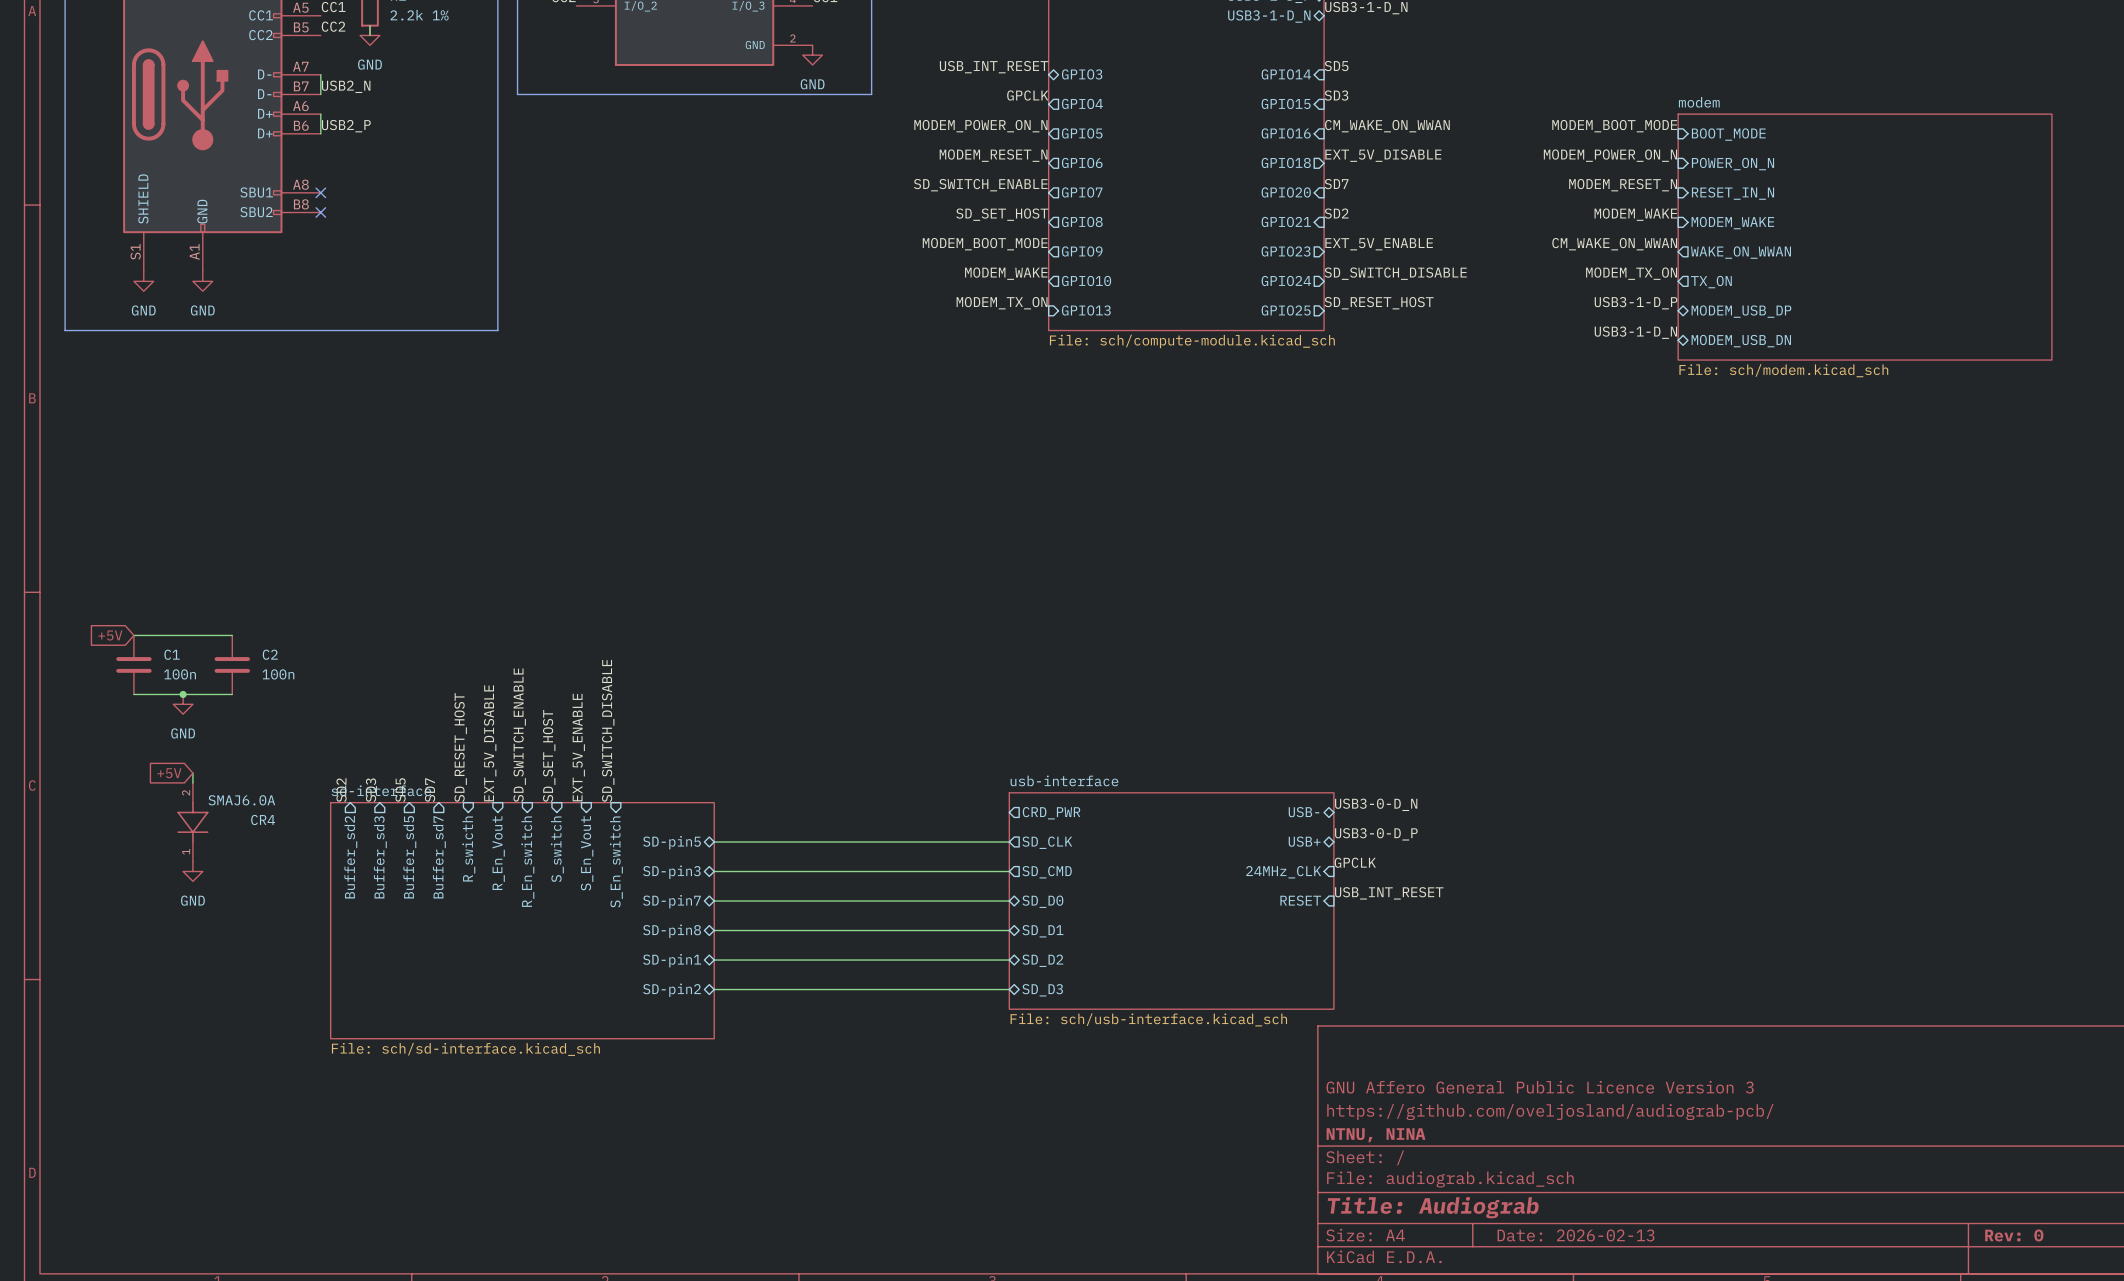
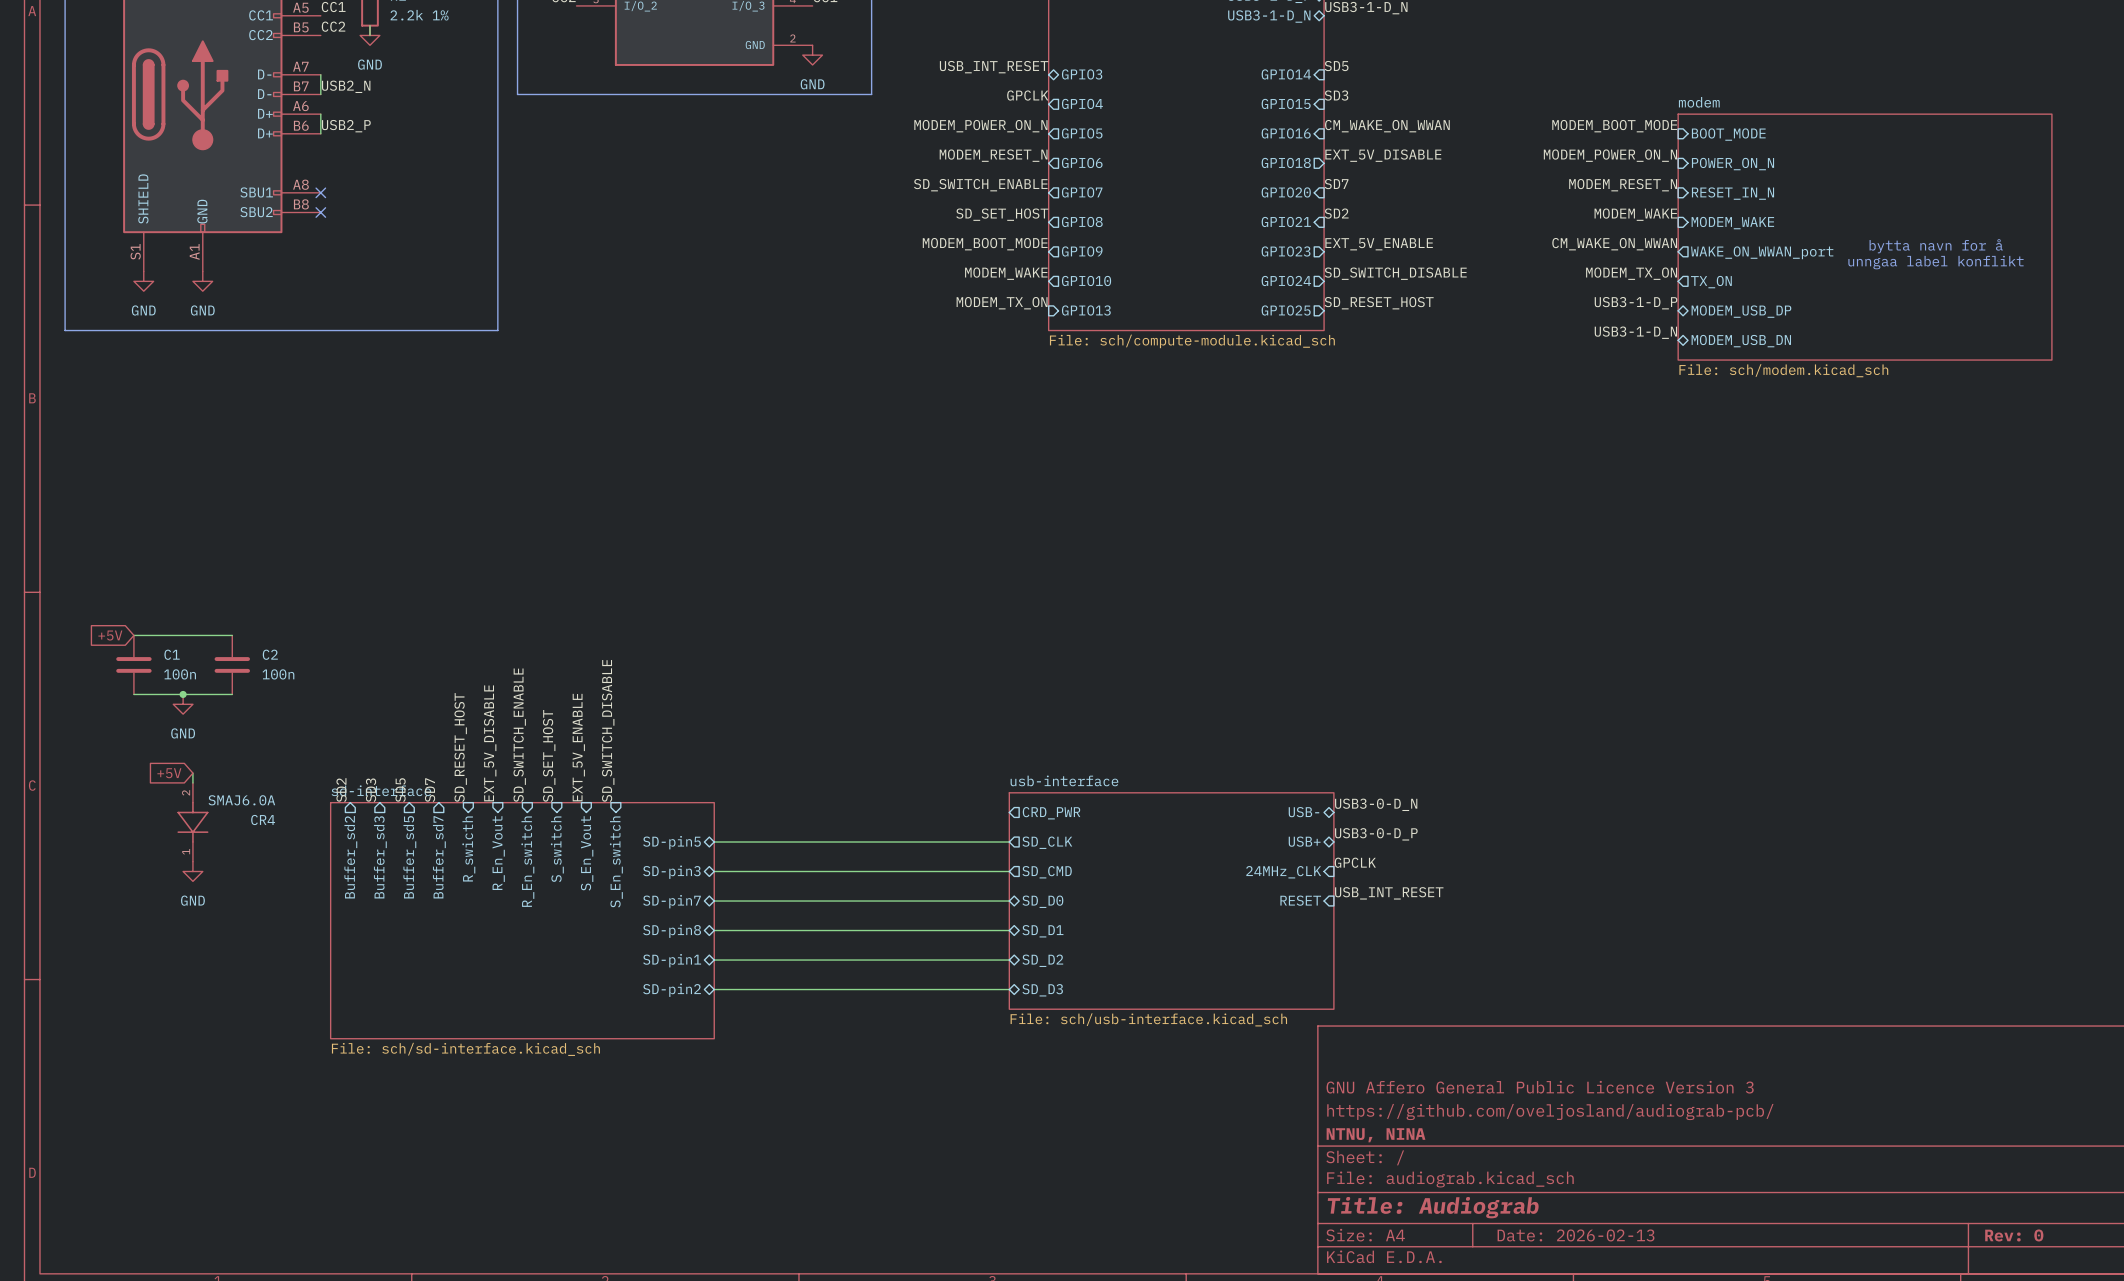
text: none -> bytta navn for å (1936, 246)
sheet pin: WAKE_ON_WWAN (1741, 252) -> WAKE_ON_WWAN_port (1762, 252)
text: none -> unngaa label konflikt (1935, 262)

